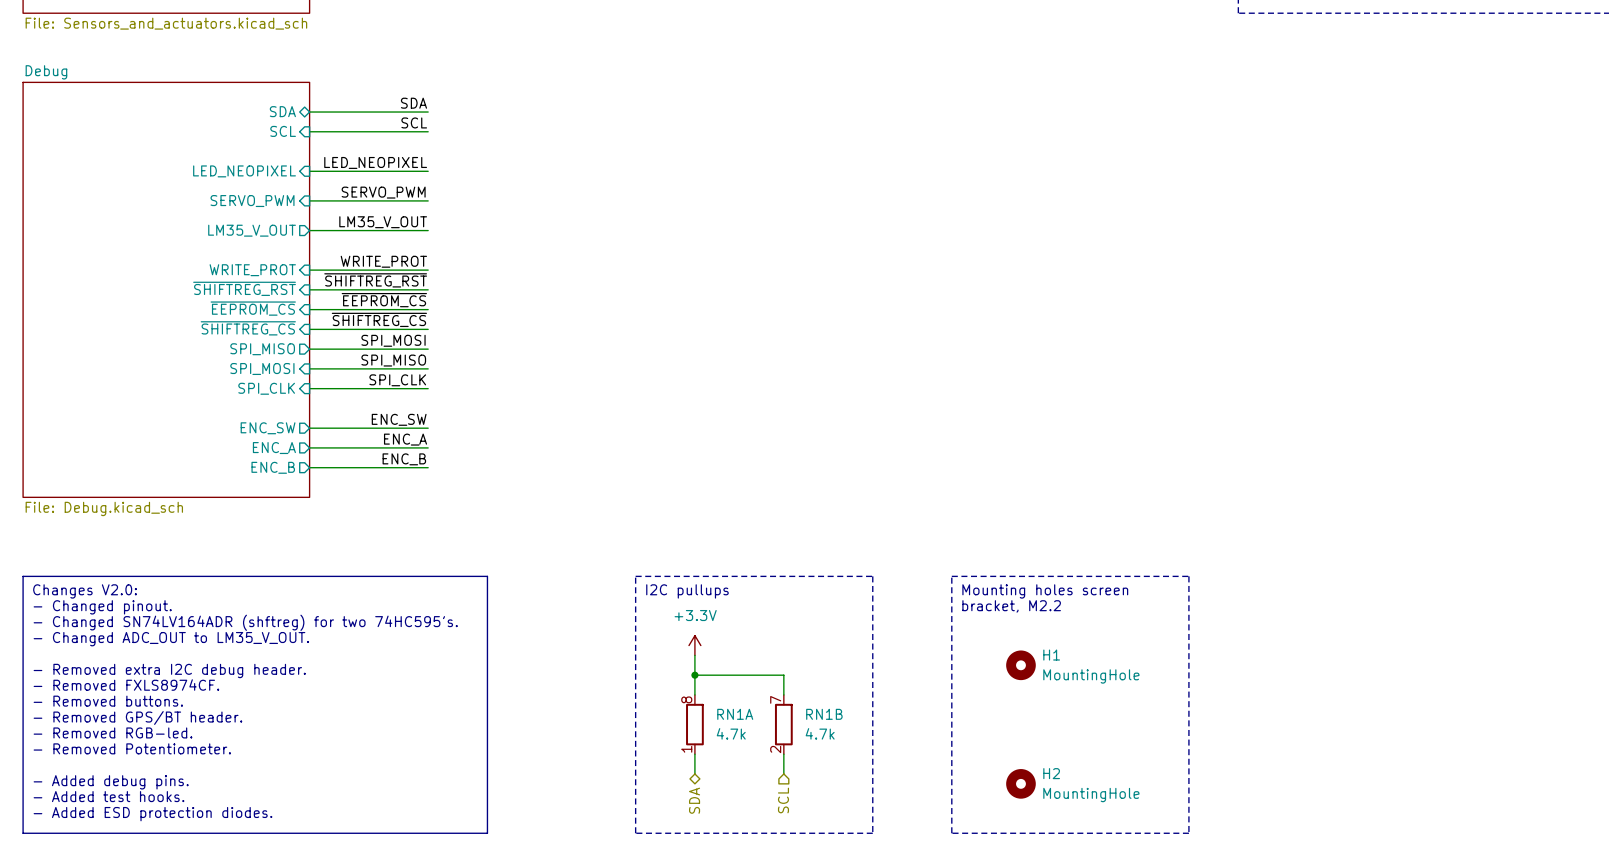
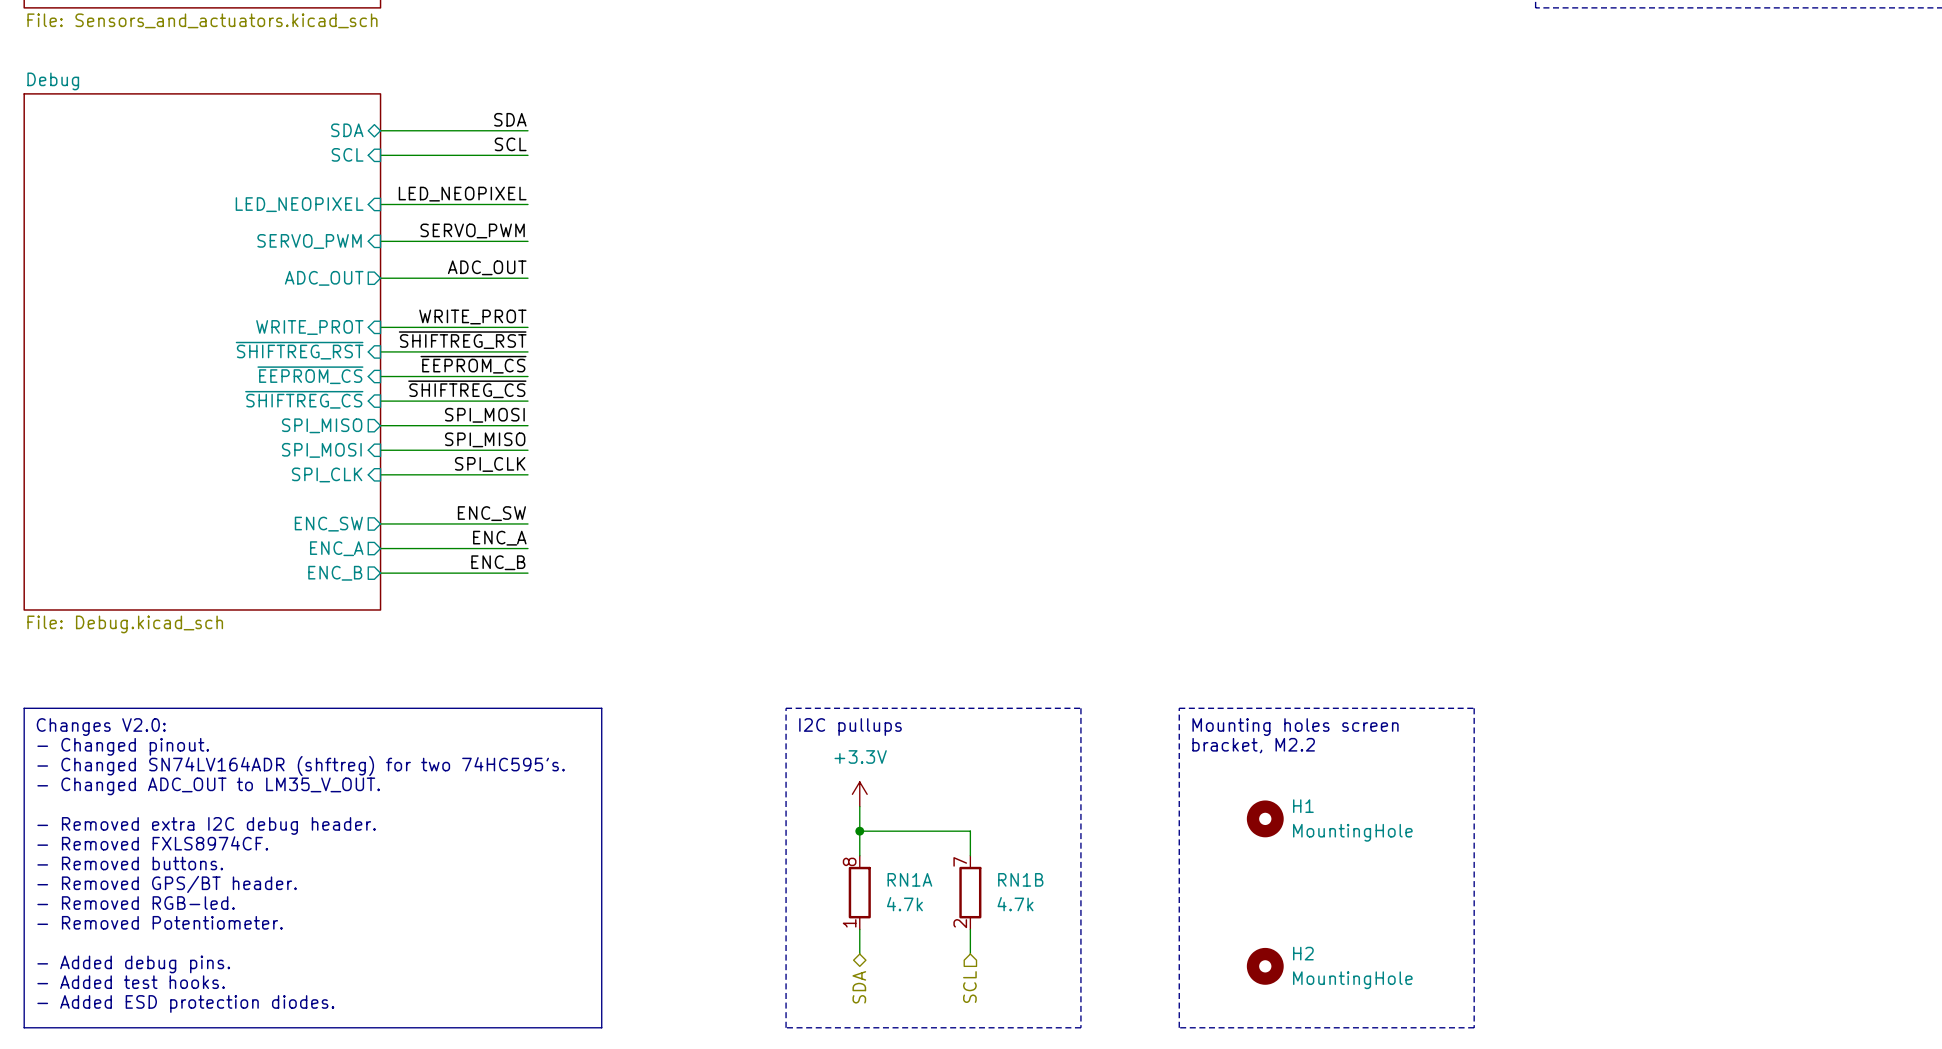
label: LM35_V_OUT (383, 222) -> ADC_OUT (487, 267)
sheet pin: LM35_V_OUT (252, 230) -> ADC_OUT (324, 278)

